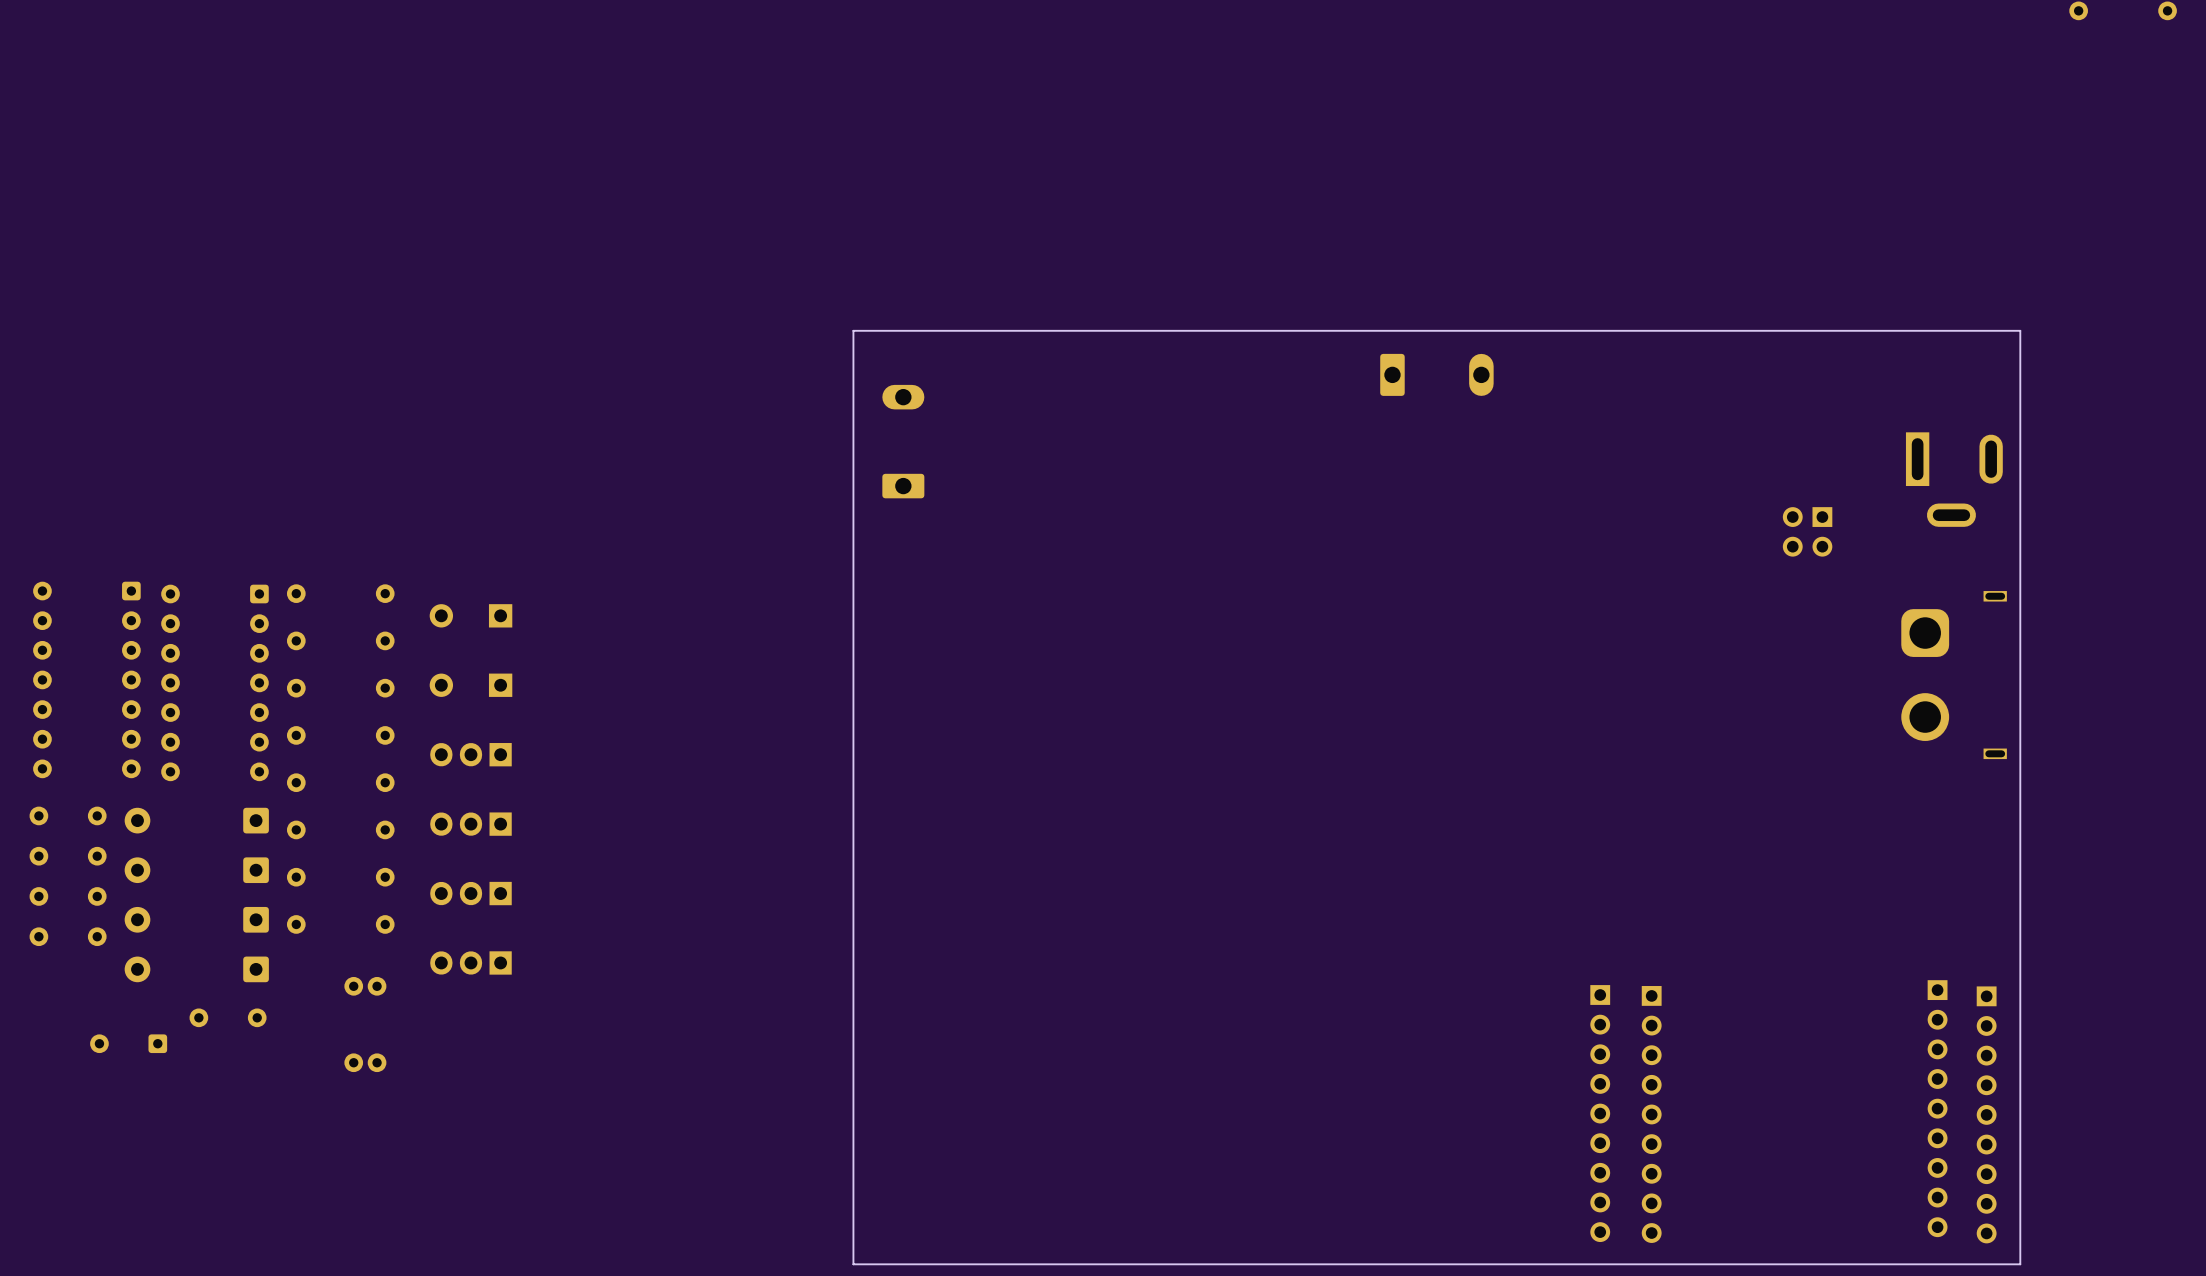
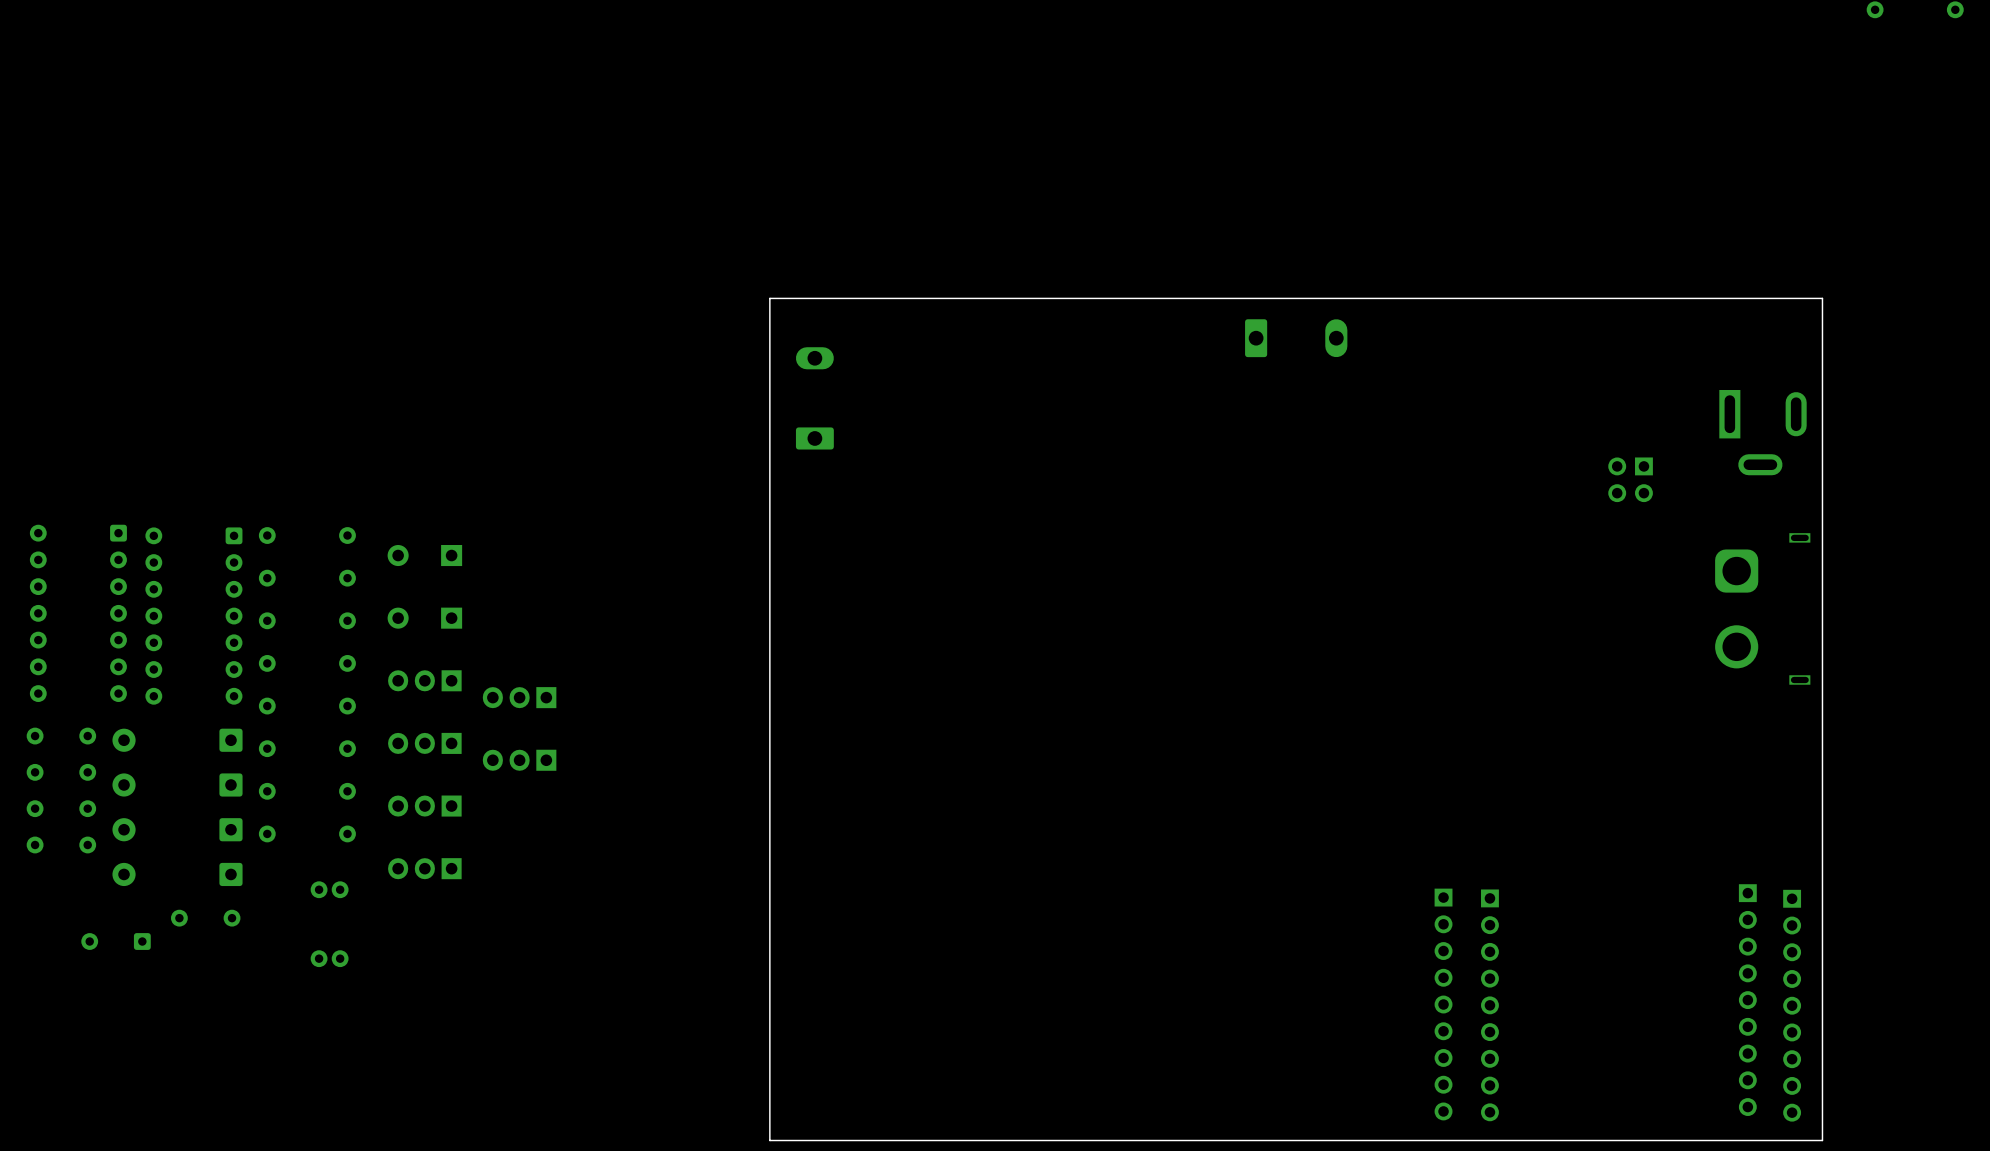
part: none -> (519, 697)
part: none -> (519, 760)

